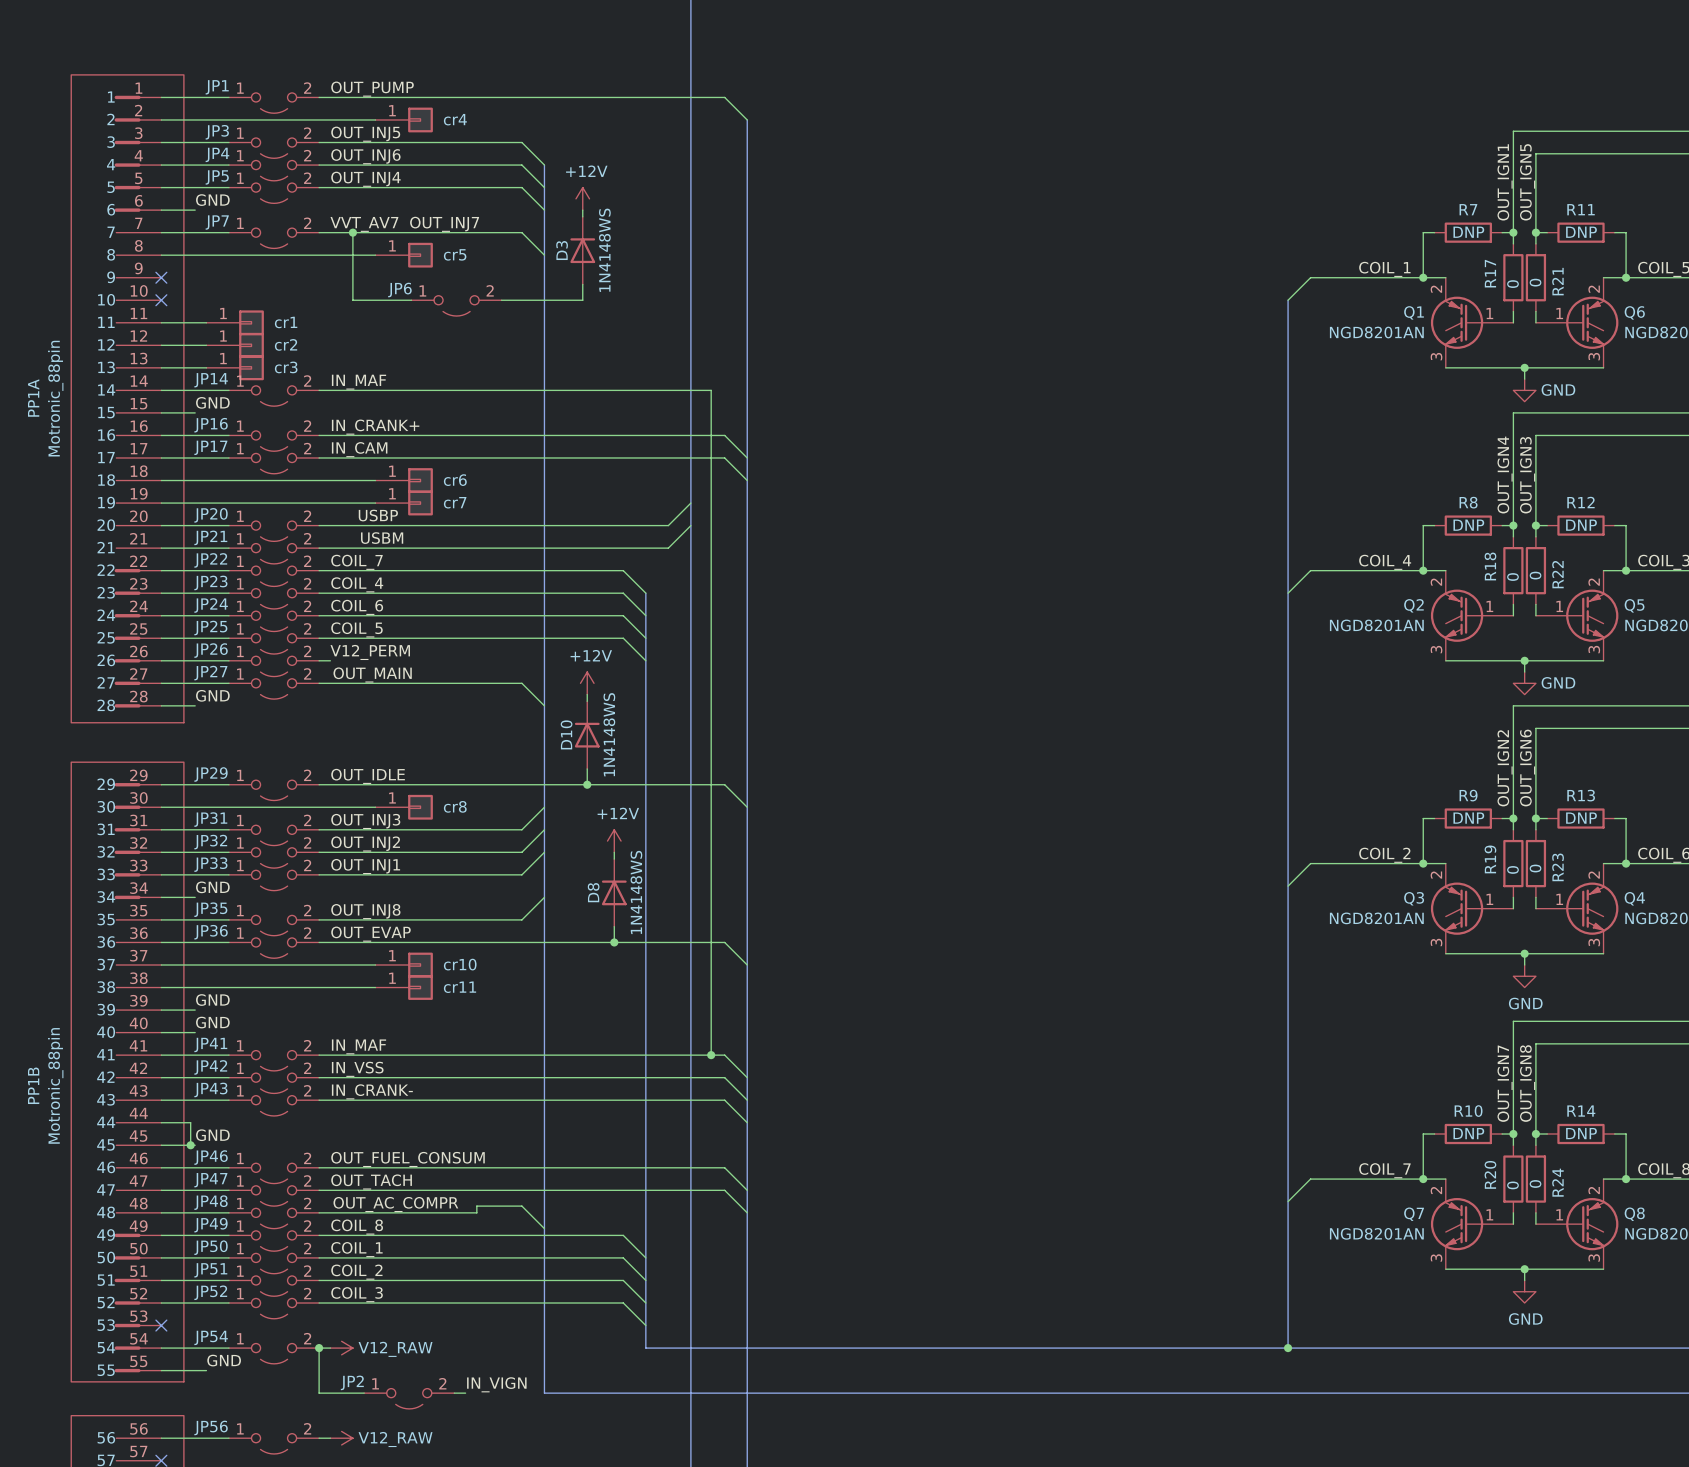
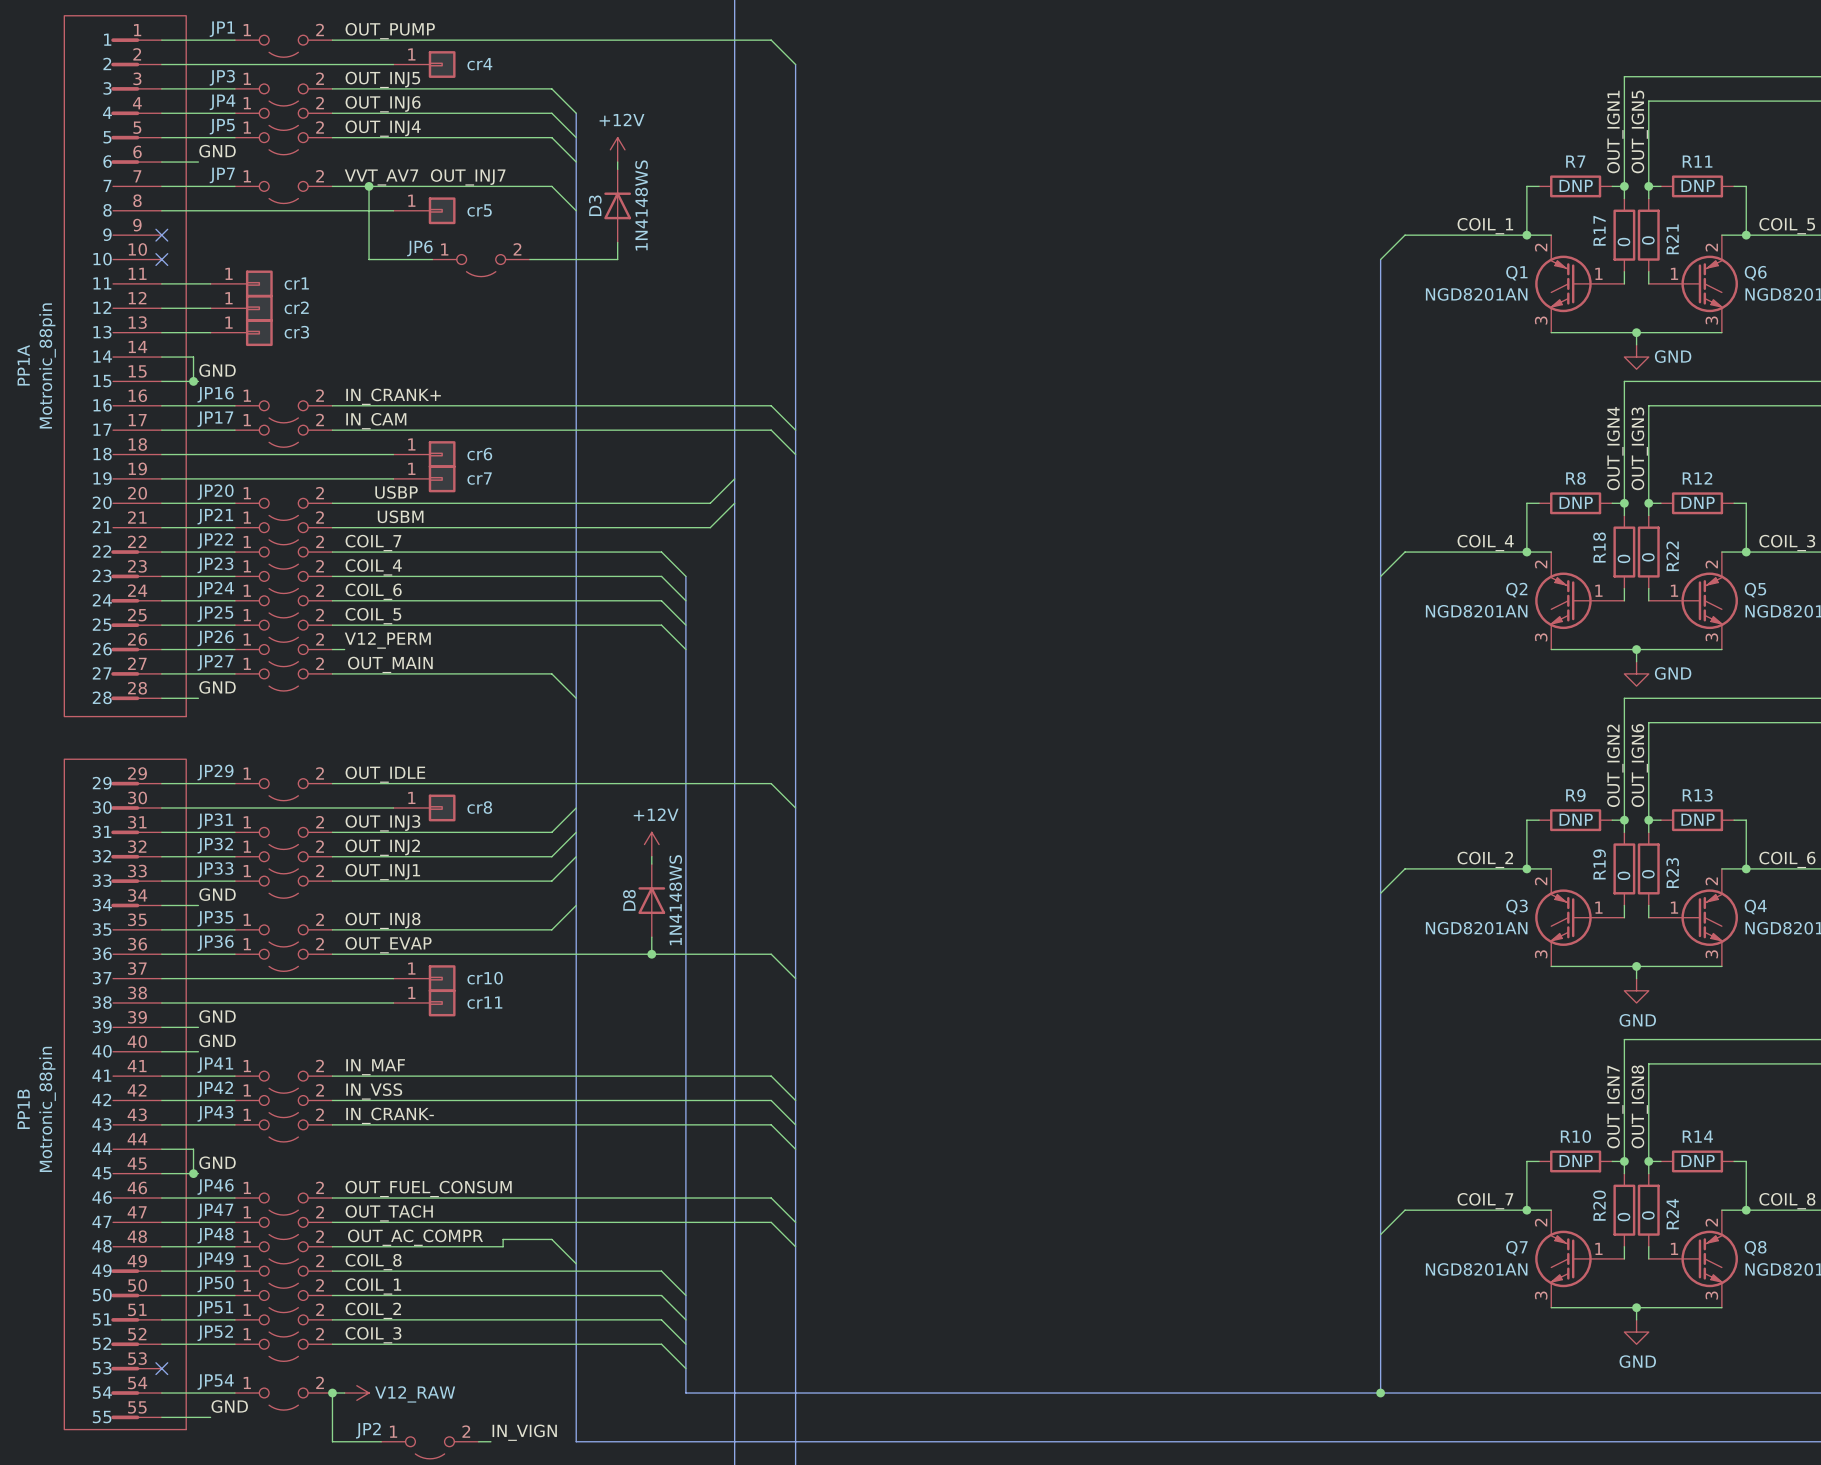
label: IN_MAF (359, 382) -> none
wire: (190, 390) (228, 390) -> (193, 357) (193, 381)
wire: (319, 390) (711, 390) (711, 1055) -> none
JP14: (274, 396) -> none
junction: none -> (193, 381)
power symbol: +12V (587, 683) -> none
wire: (587, 694) (587, 701) -> none
D10: 1N4148WS (587, 735) -> none
wire: (587, 768) (587, 784) -> none
junction: (587, 784) -> none
junction: (711, 1055) -> none

